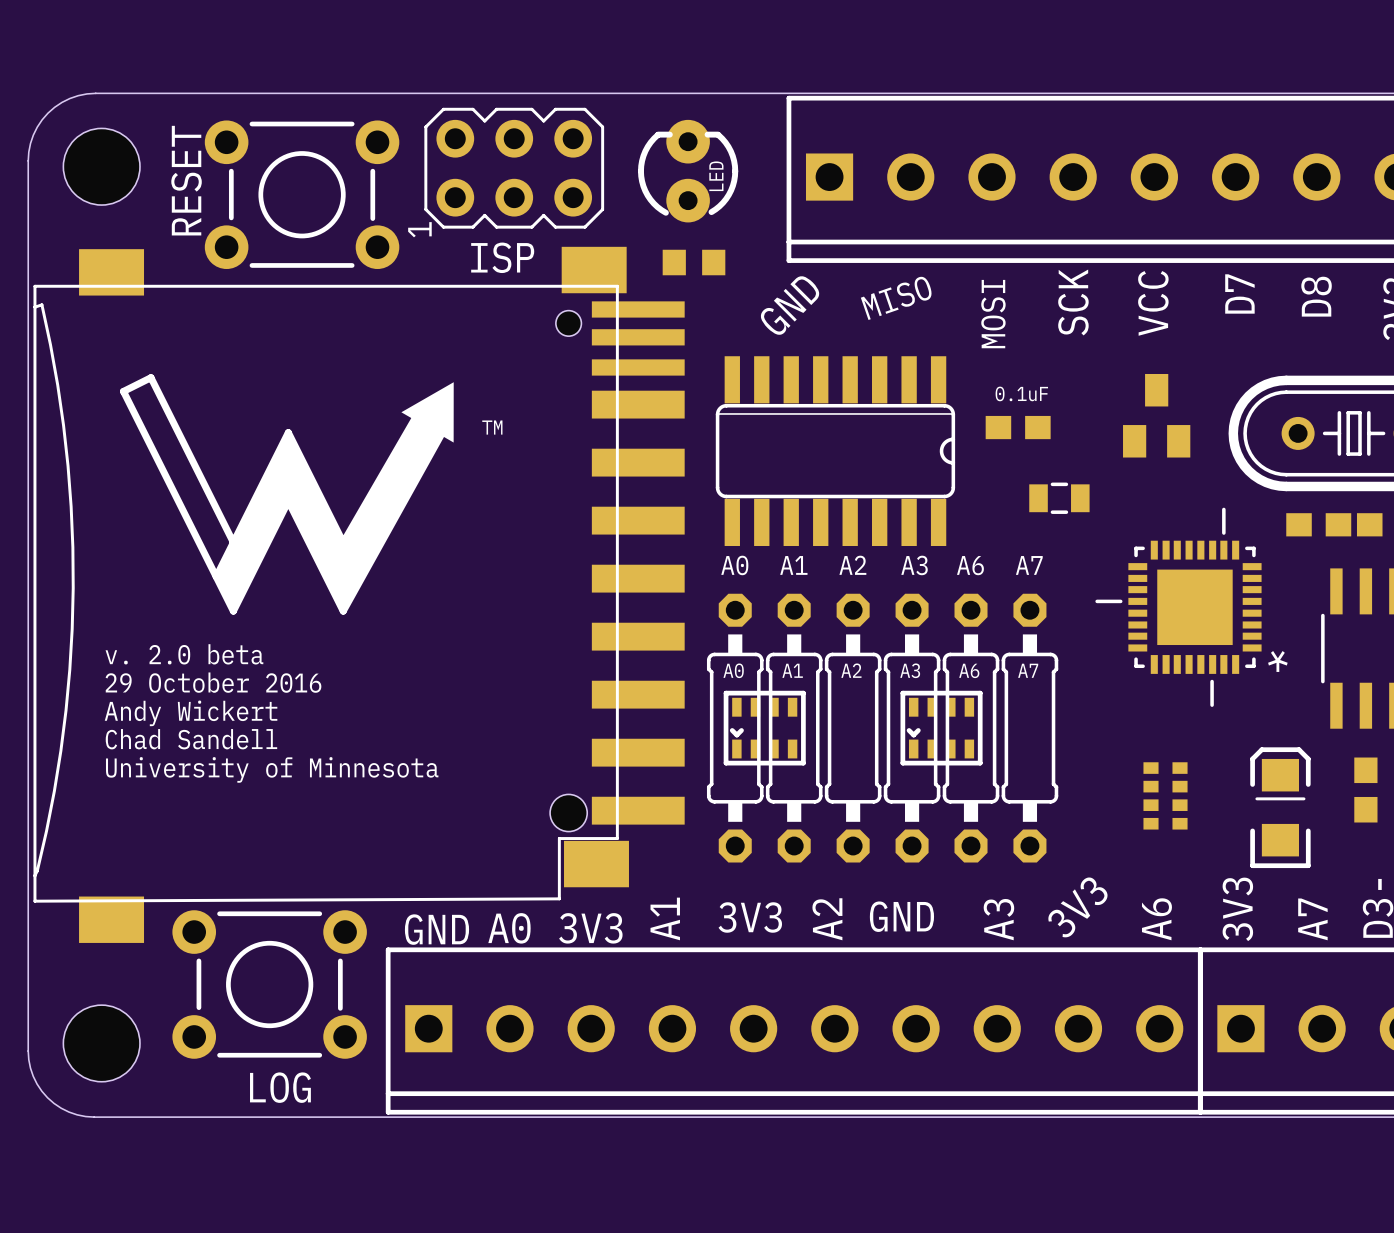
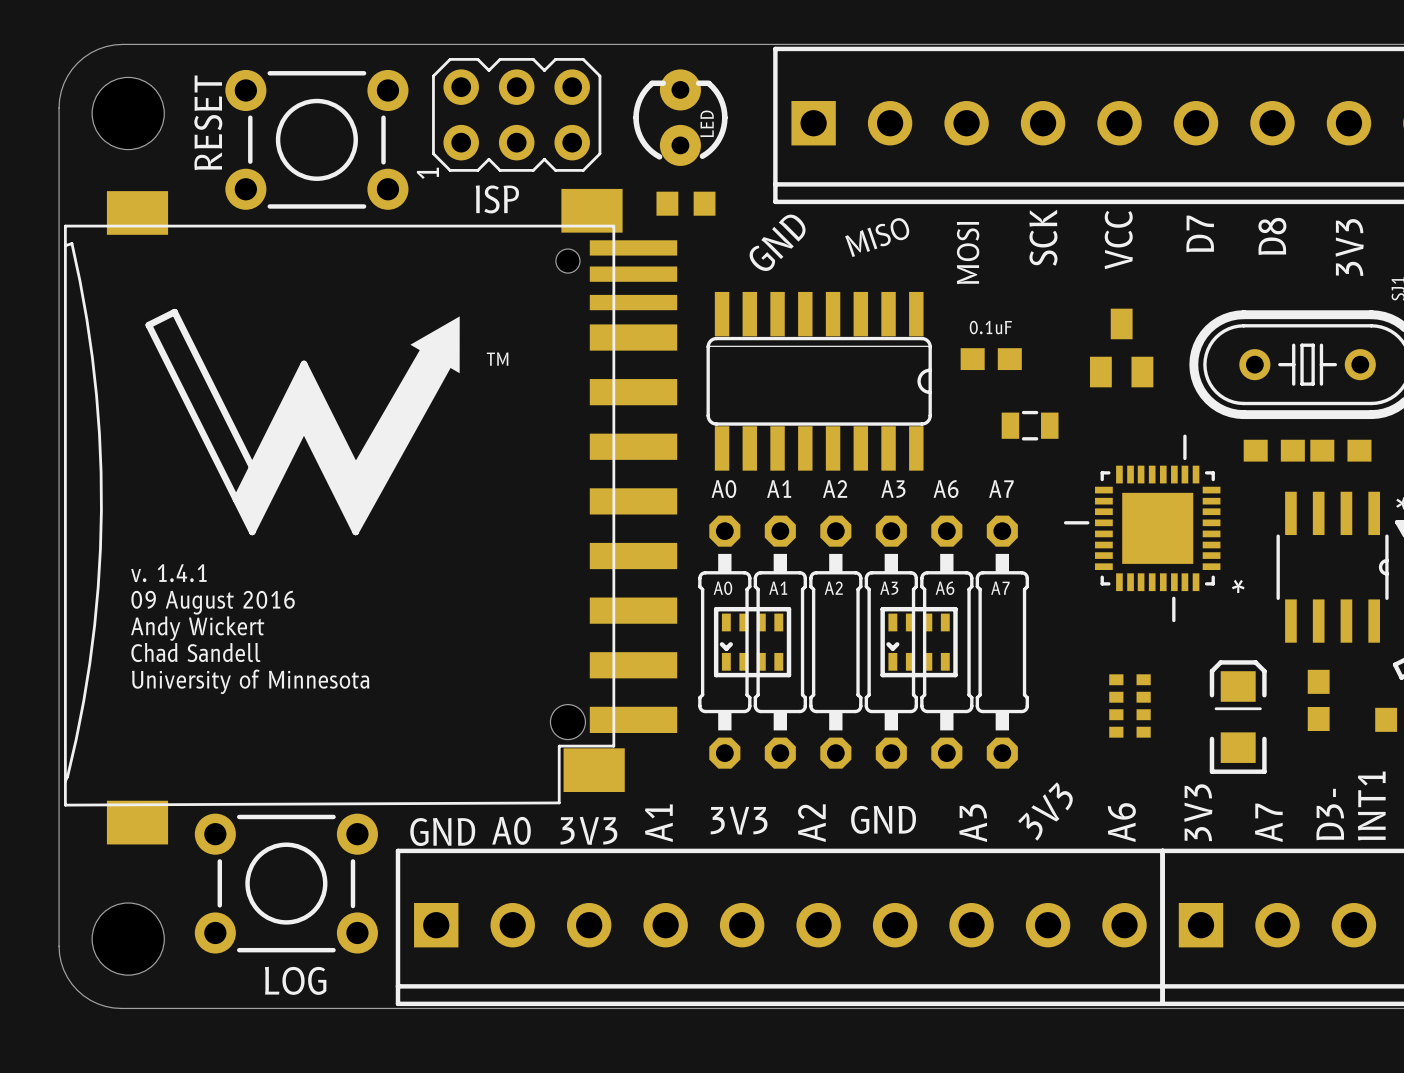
text: v. 2.0 beta (184, 654) -> v. 1.4.1 (168, 573)
text: 29 October 2016 (213, 682) -> 09 August 2016 (213, 602)

